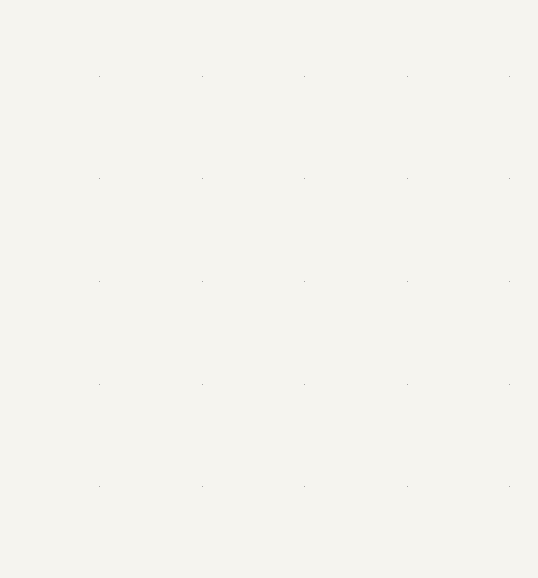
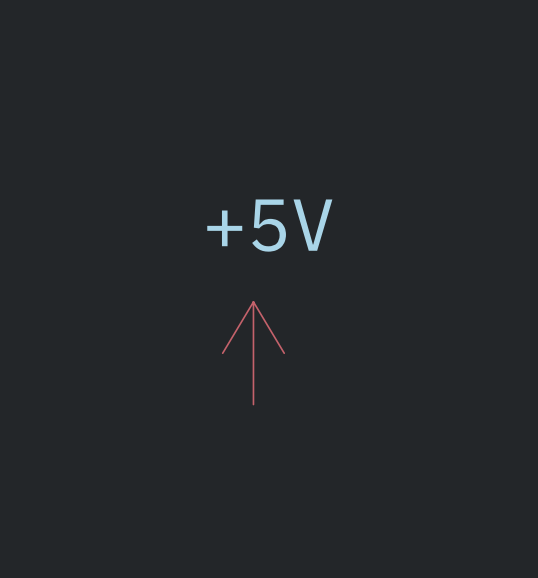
power symbol: none -> +5V (253, 353)

